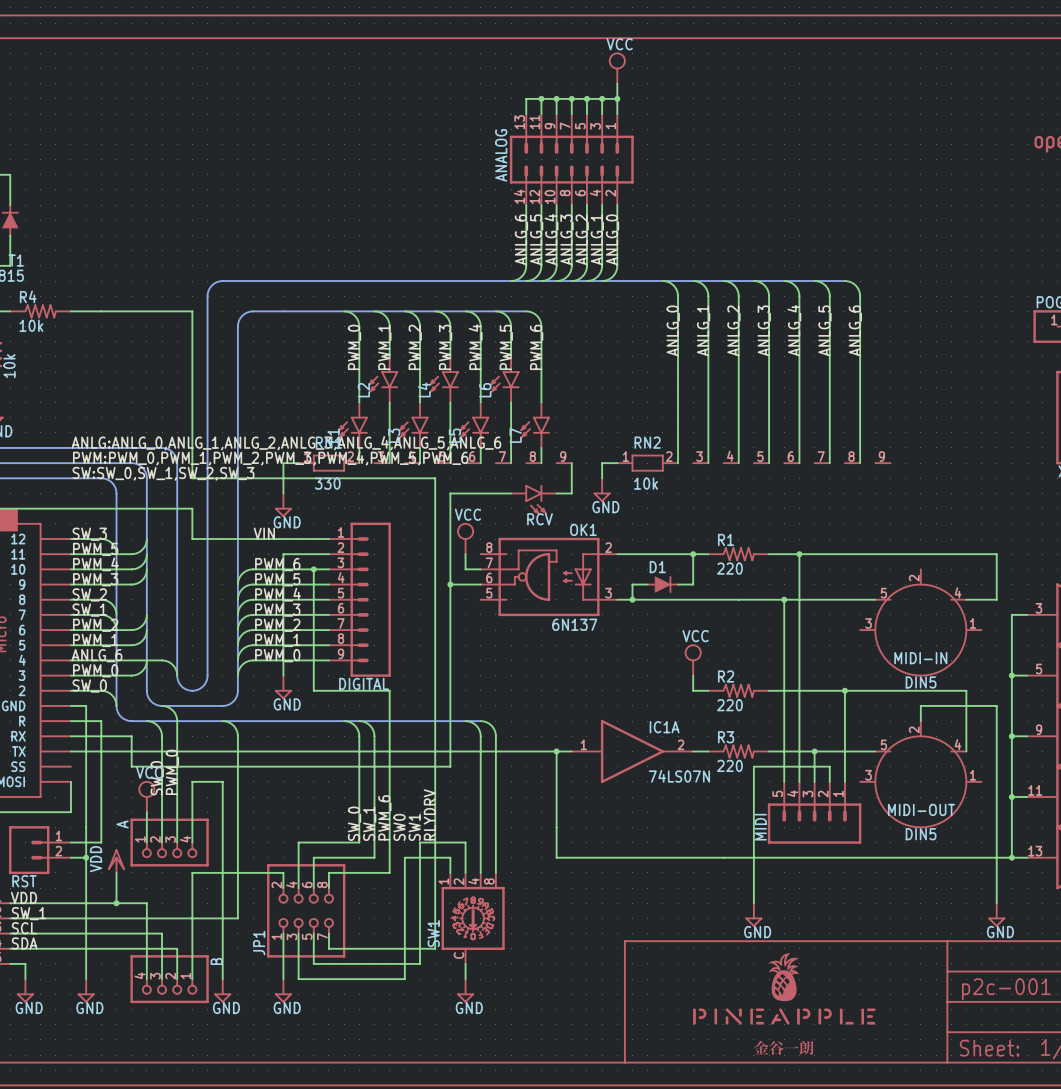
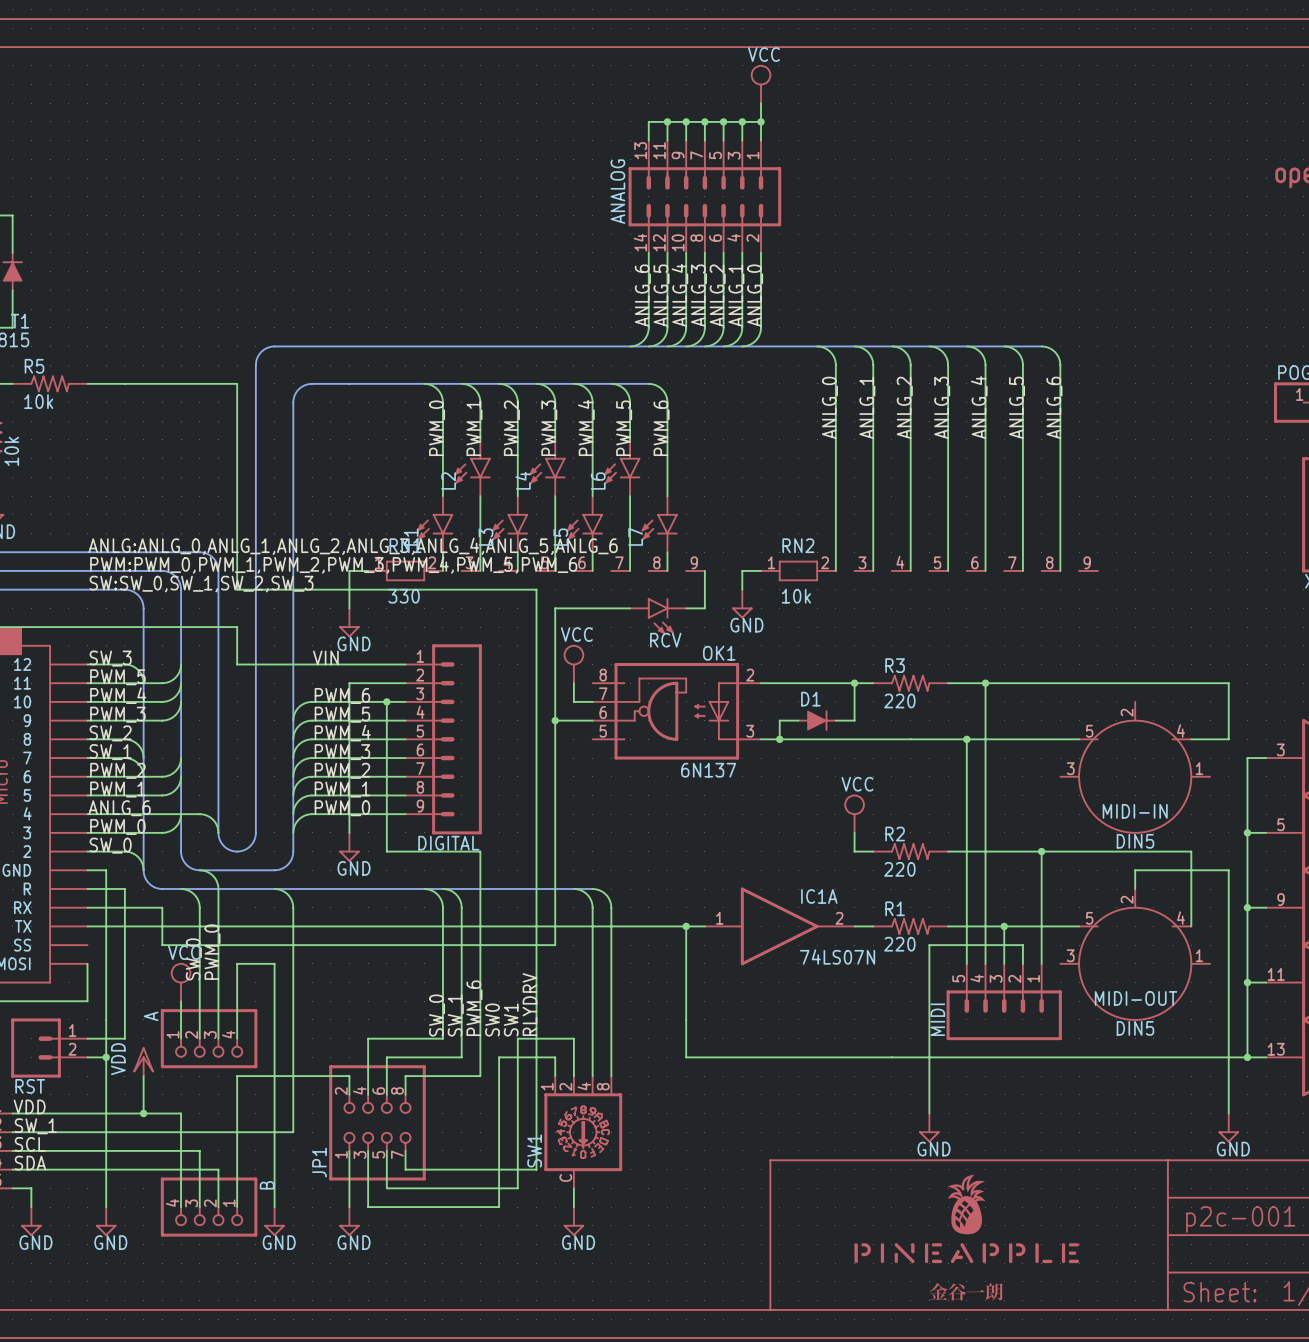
R4 name: R4 (28, 296) -> R5 (34, 366)
R1 name: R1 (726, 539) -> R3 (895, 665)
R3 name: R3 (726, 737) -> R1 (895, 908)

